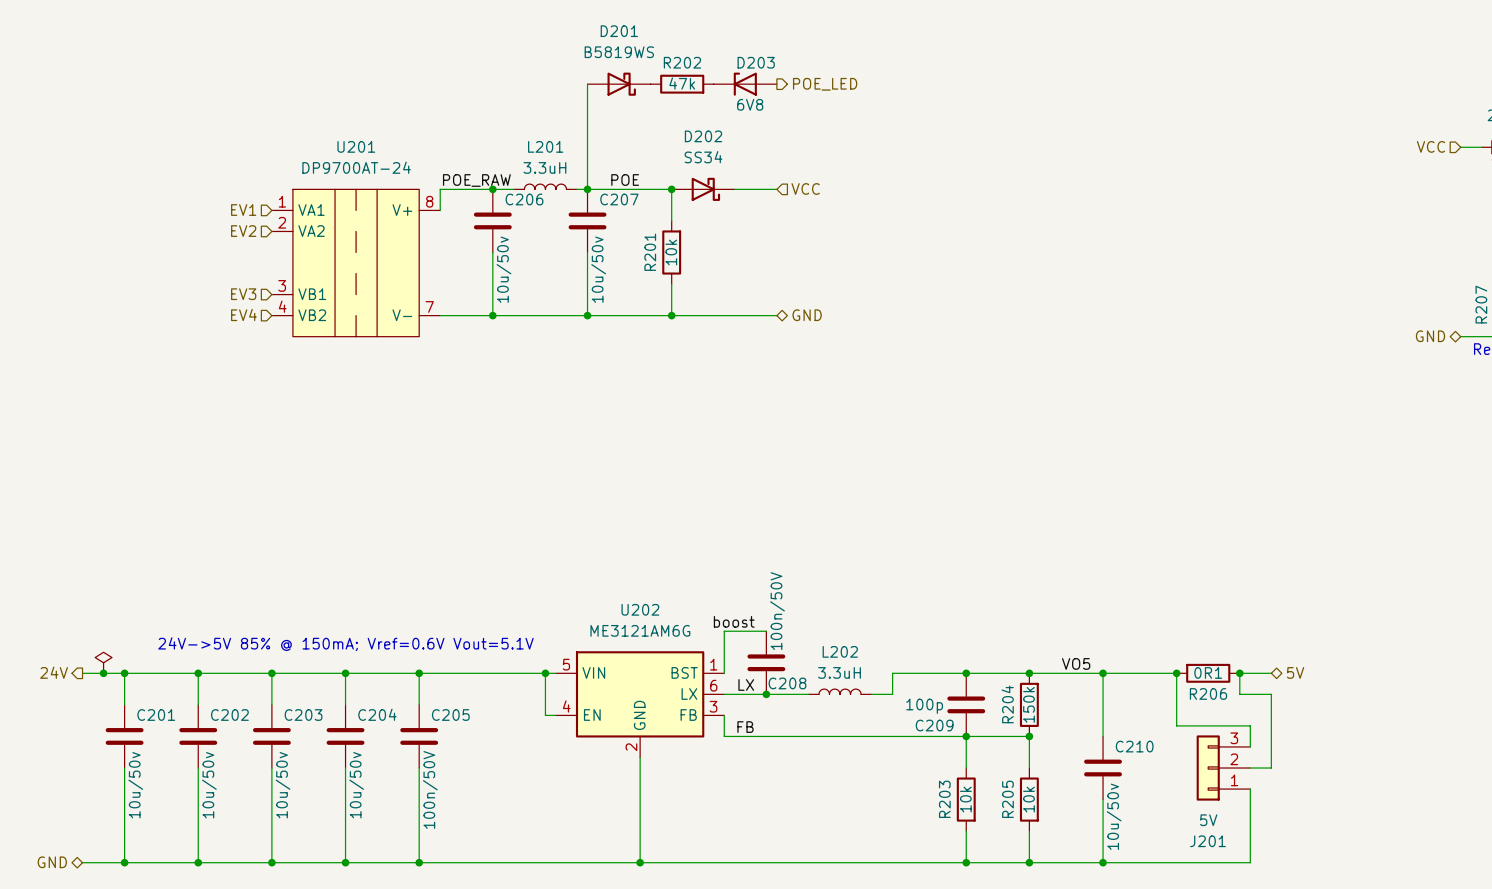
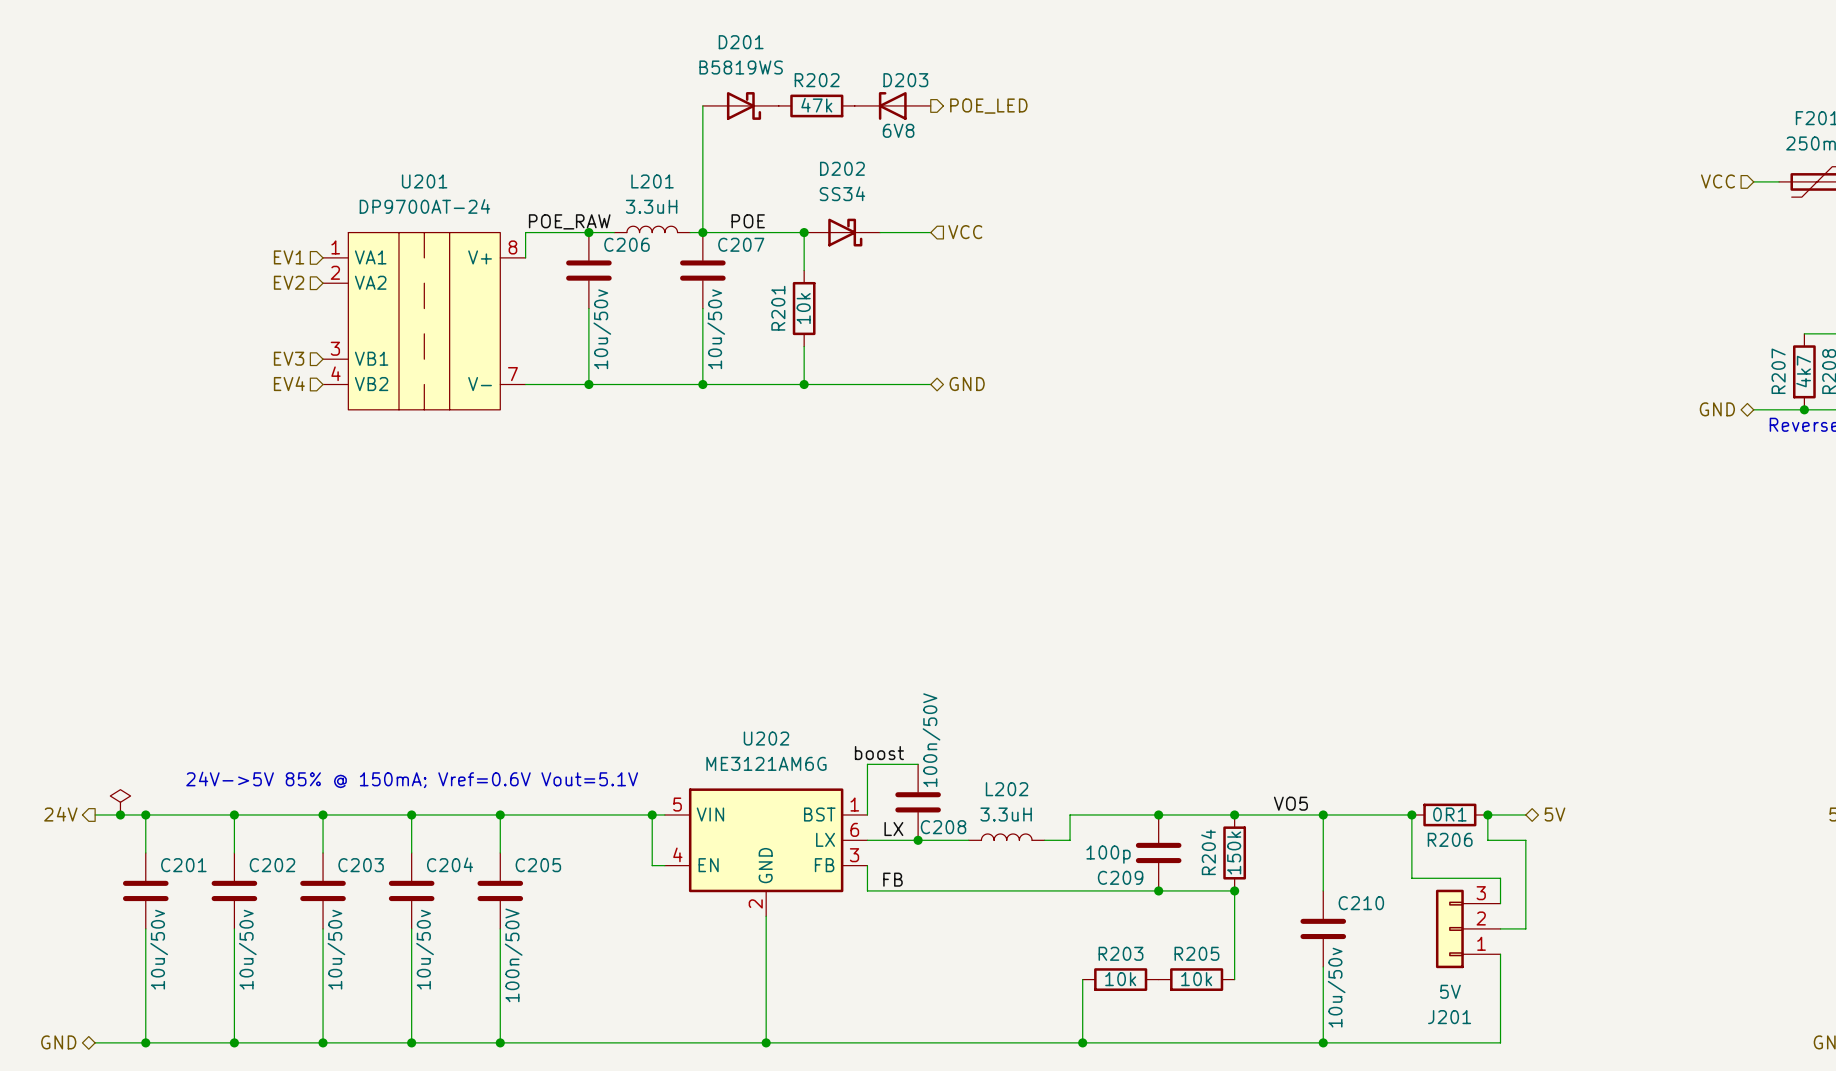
wire: (966, 736) (966, 768) -> none
wire: none -> (1234, 928) (1234, 979)
R203 rotation: 0° (966, 799) -> 90° clockwise (1120, 979)
R205 rotation: 0° (1029, 799) -> 90° clockwise (1196, 979)
wire: none -> (1082, 979) (1082, 1042)
wire: (966, 831) (966, 862) -> none
wire: (1029, 831) (1029, 862) -> none
junction: none -> (1082, 1042)
junction: (966, 862) -> none
junction: (1029, 862) -> none

